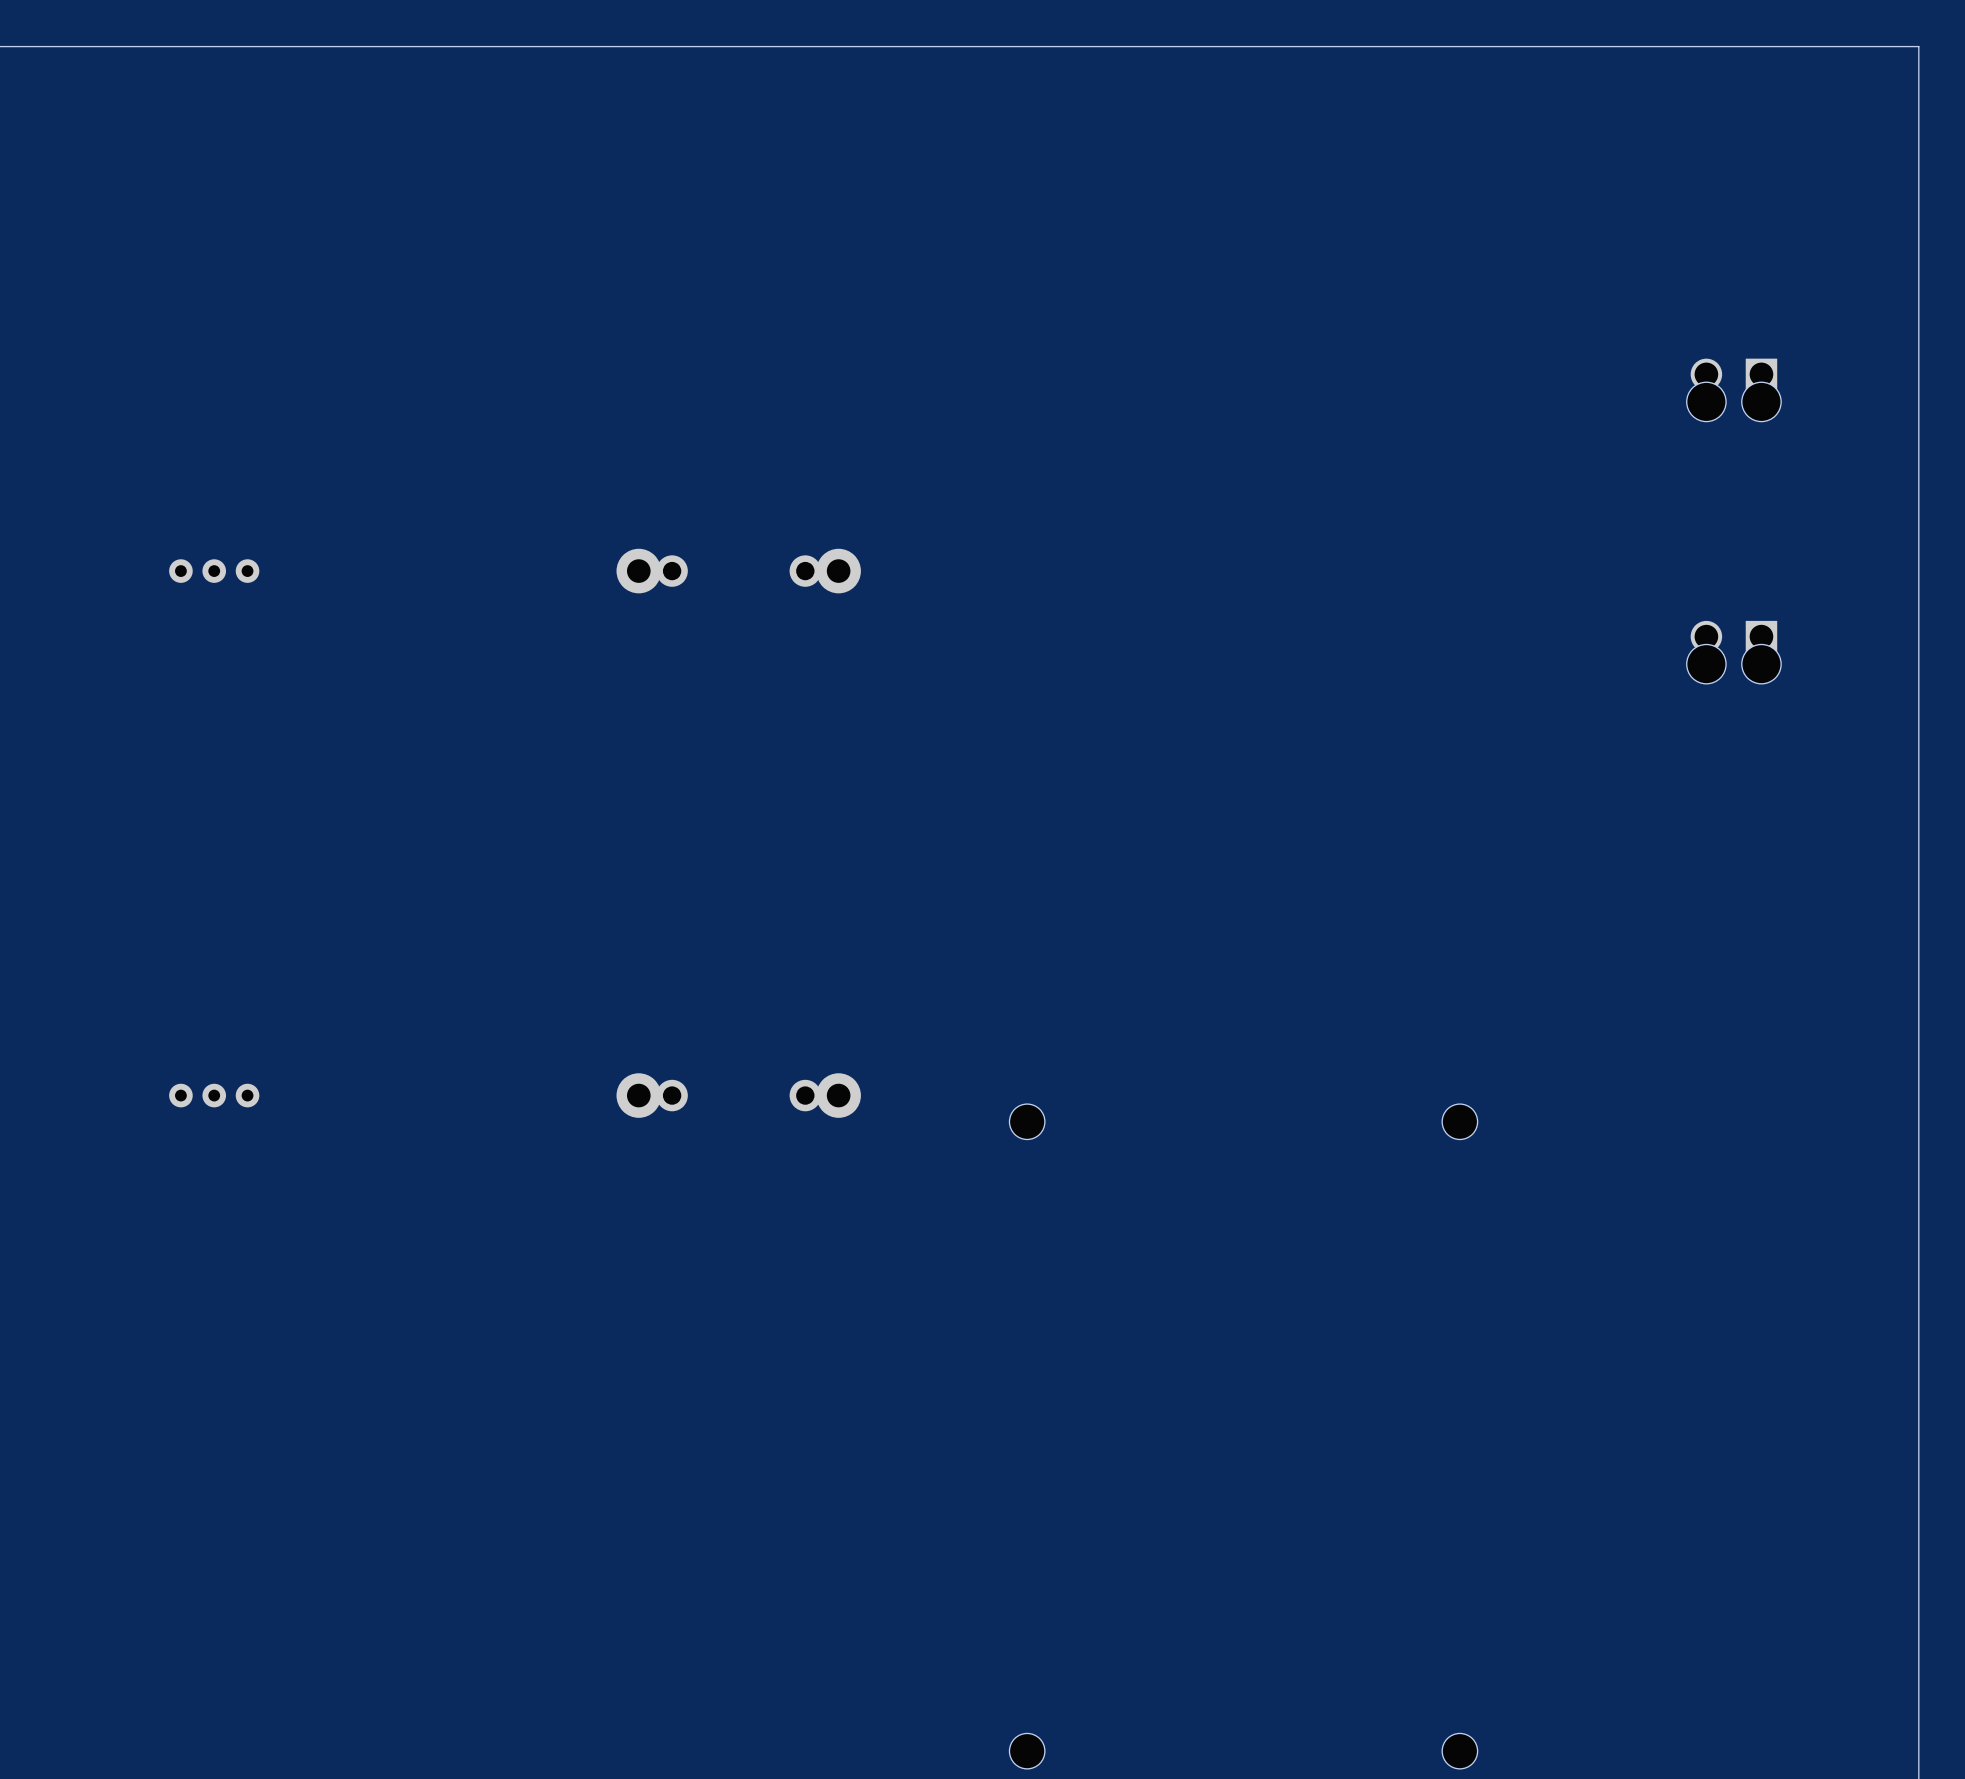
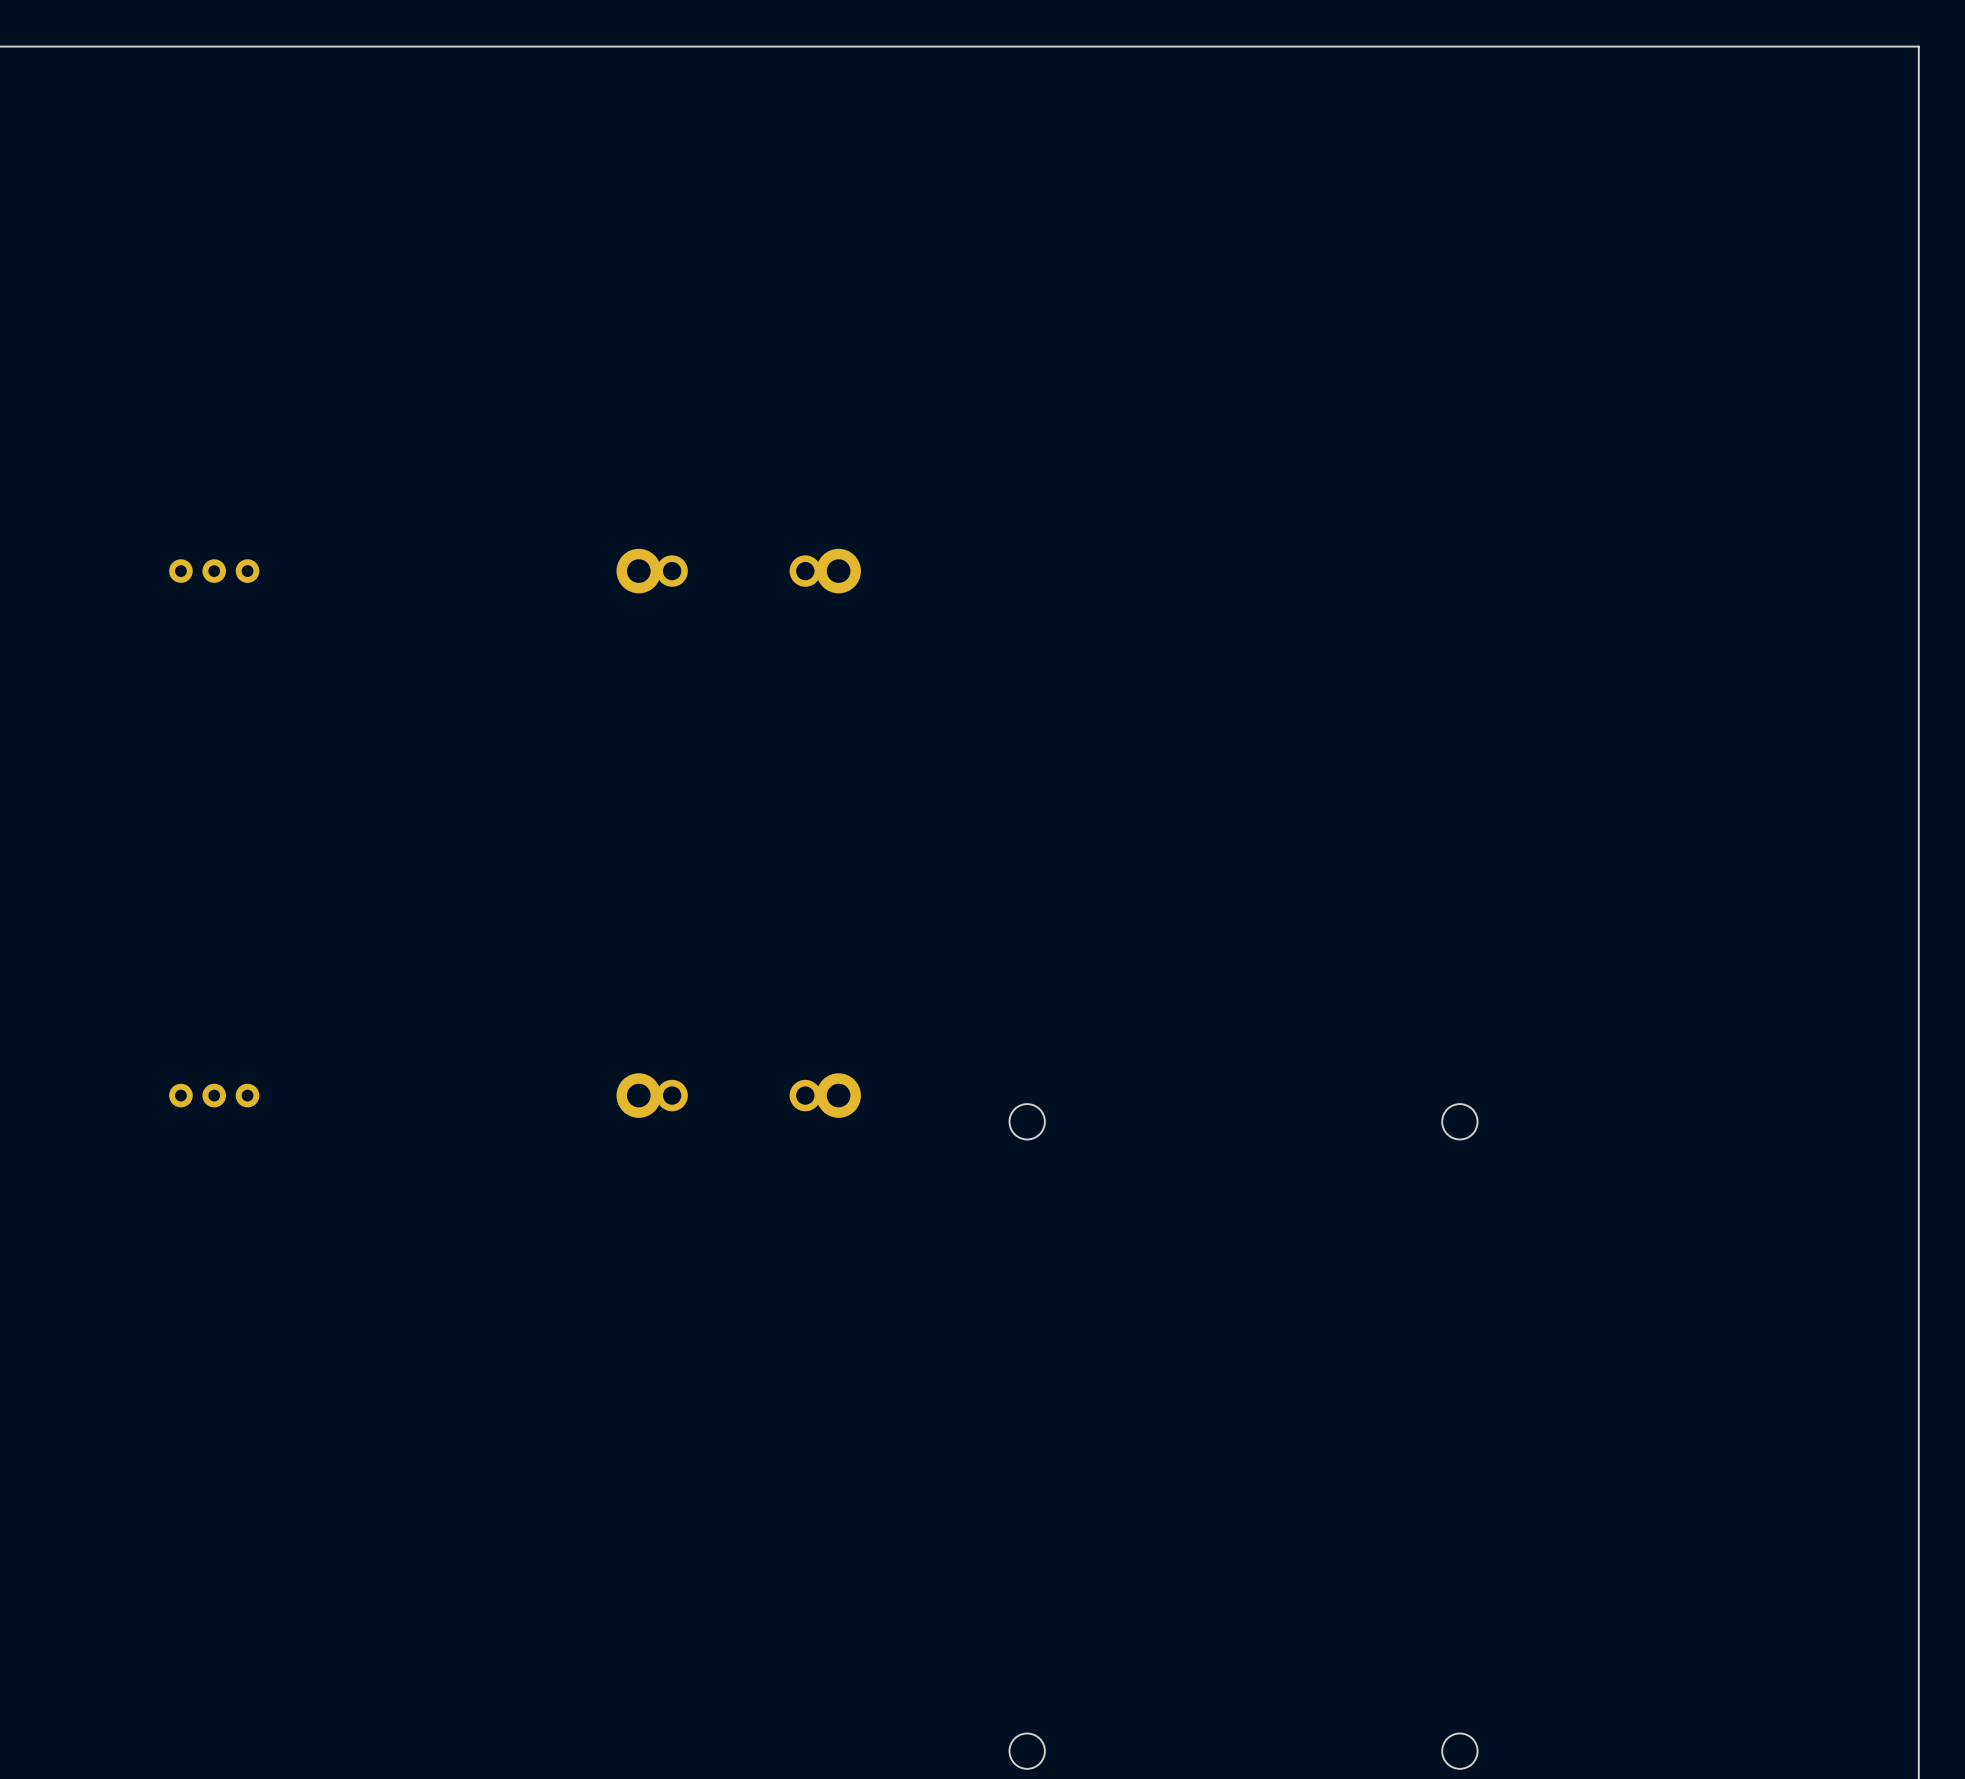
part: (1733, 390) -> none
part: (1733, 652) -> none

